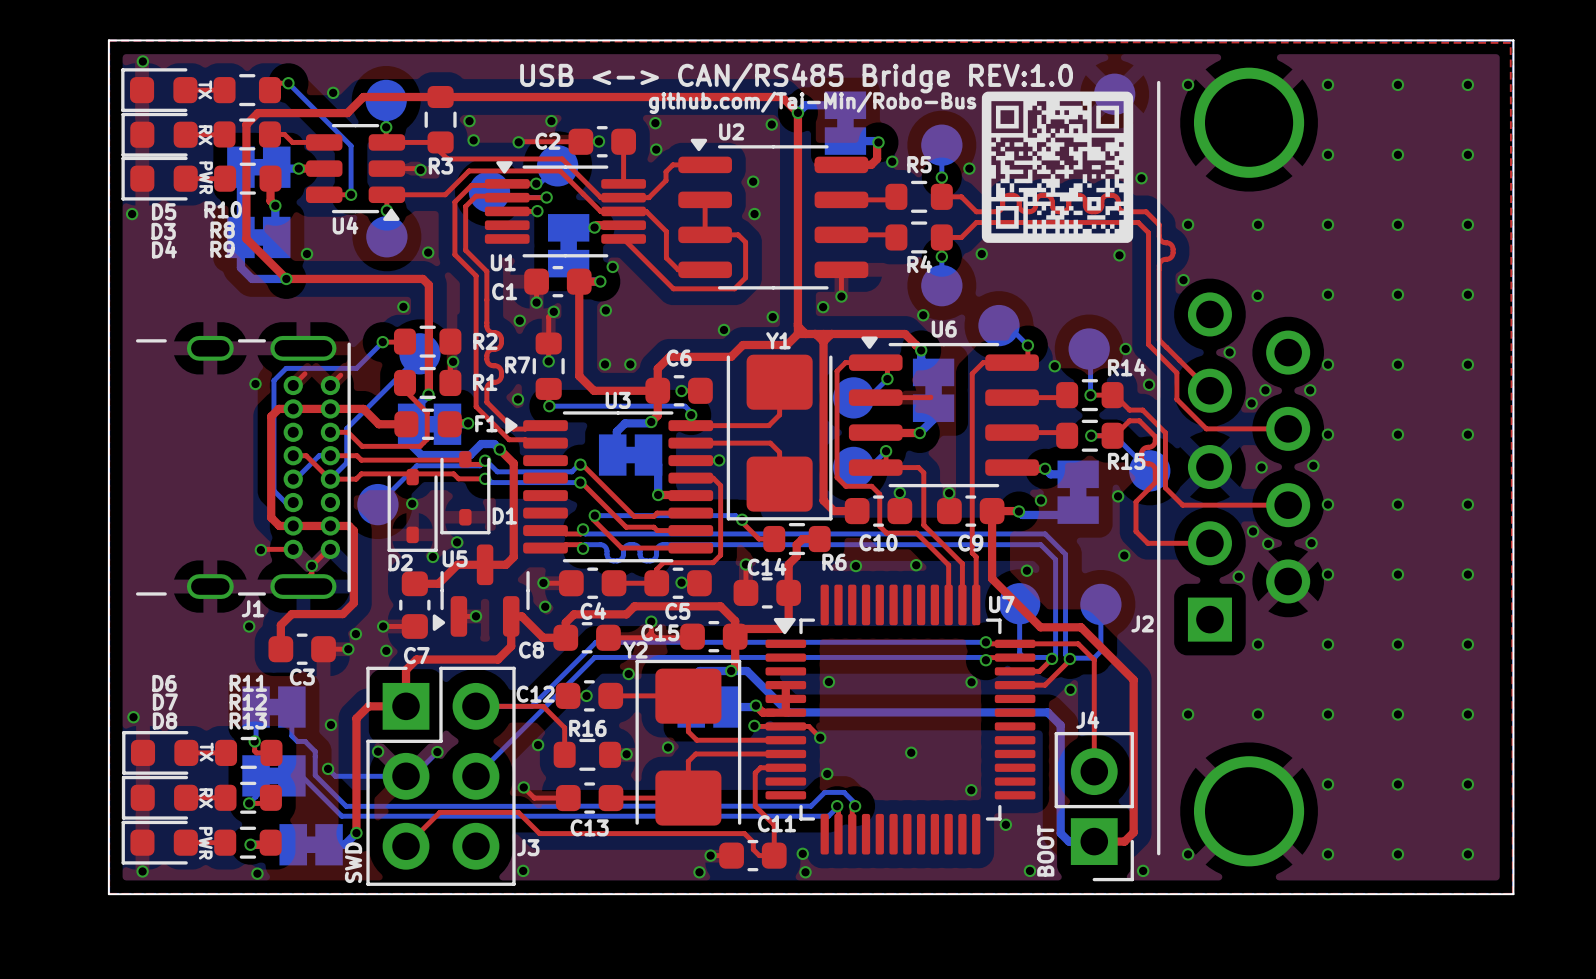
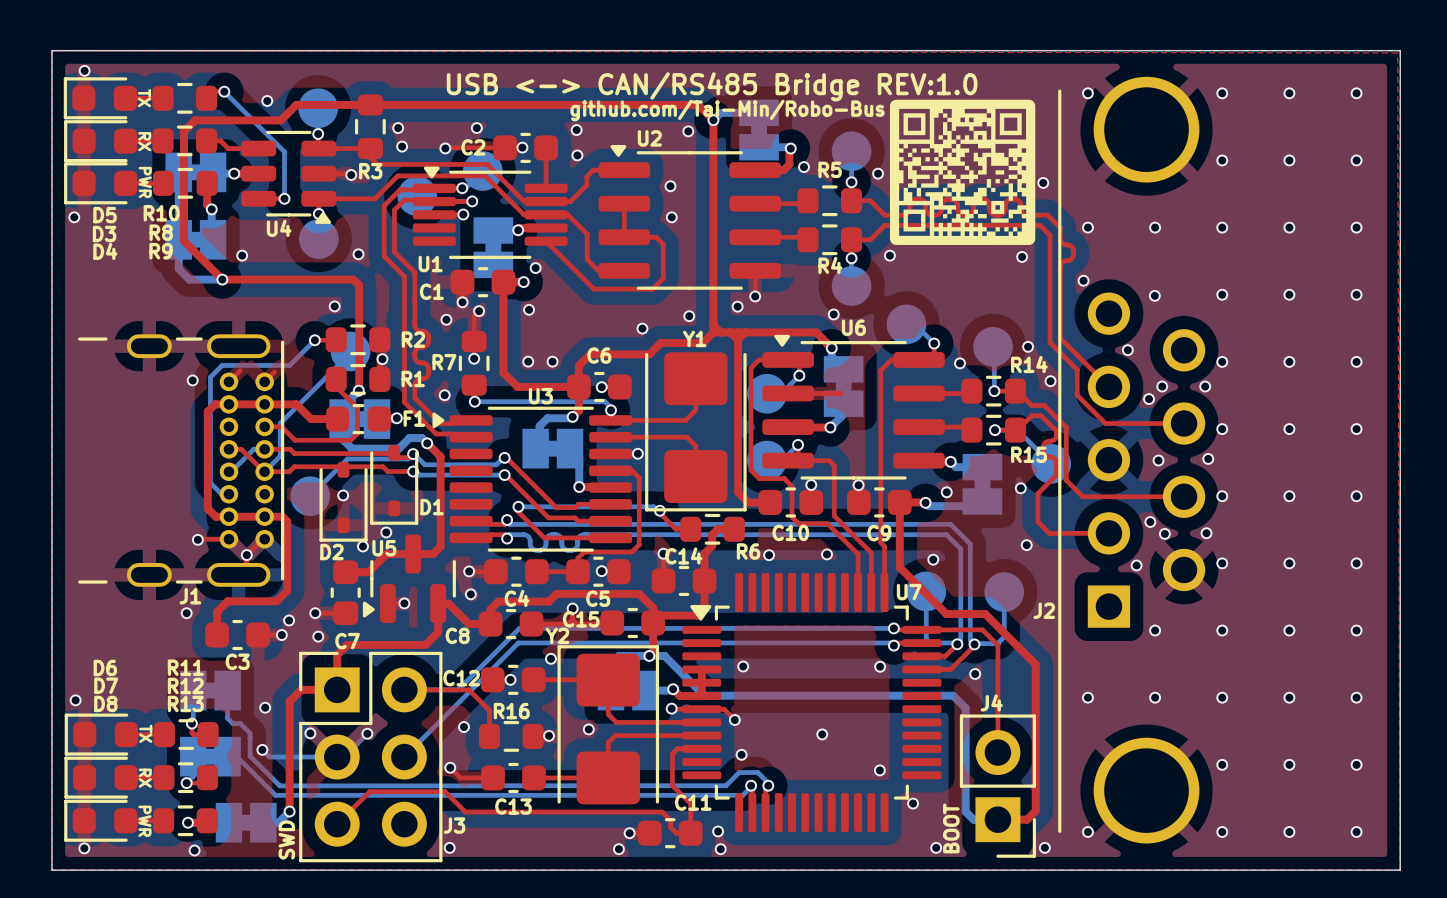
part: (1114, 94) -> none

